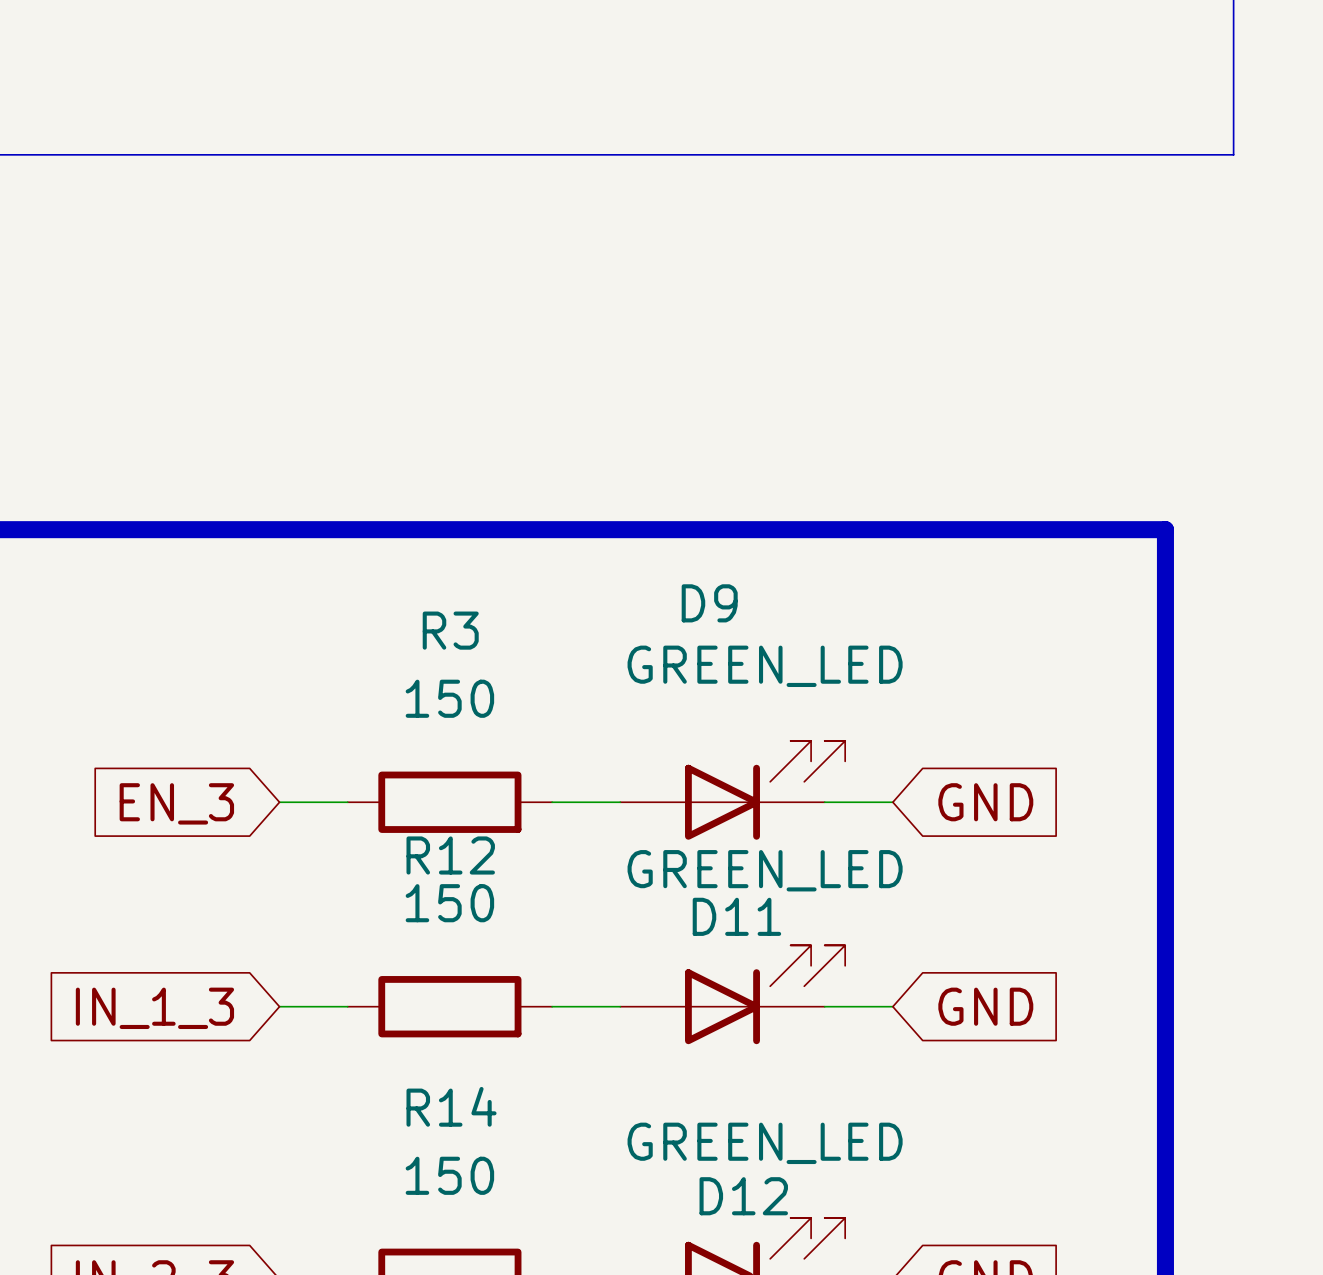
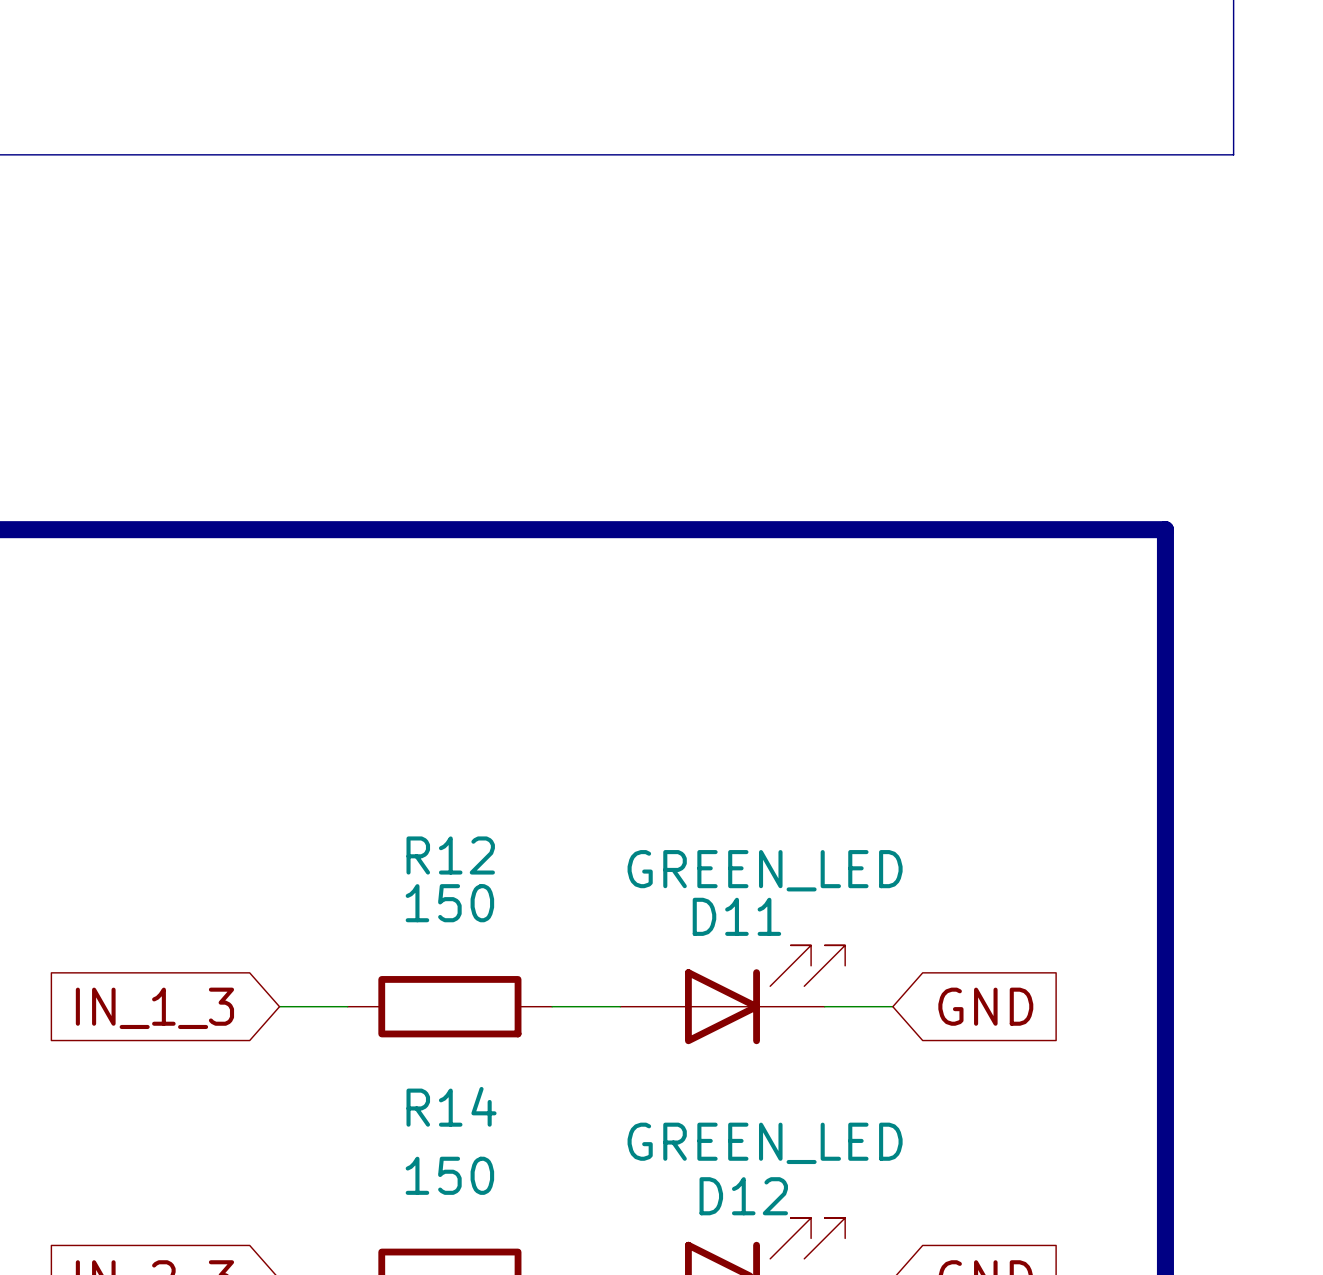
D9: GREEN_LED (732, 790) -> none
wire: (279, 802) (347, 802) -> none
R3: 150 (449, 802) -> none
wire: (552, 802) (620, 802) -> none
wire: (824, 802) (892, 802) -> none
global label: GND (985, 802) -> none
global label: EN_3 (176, 803) -> none

